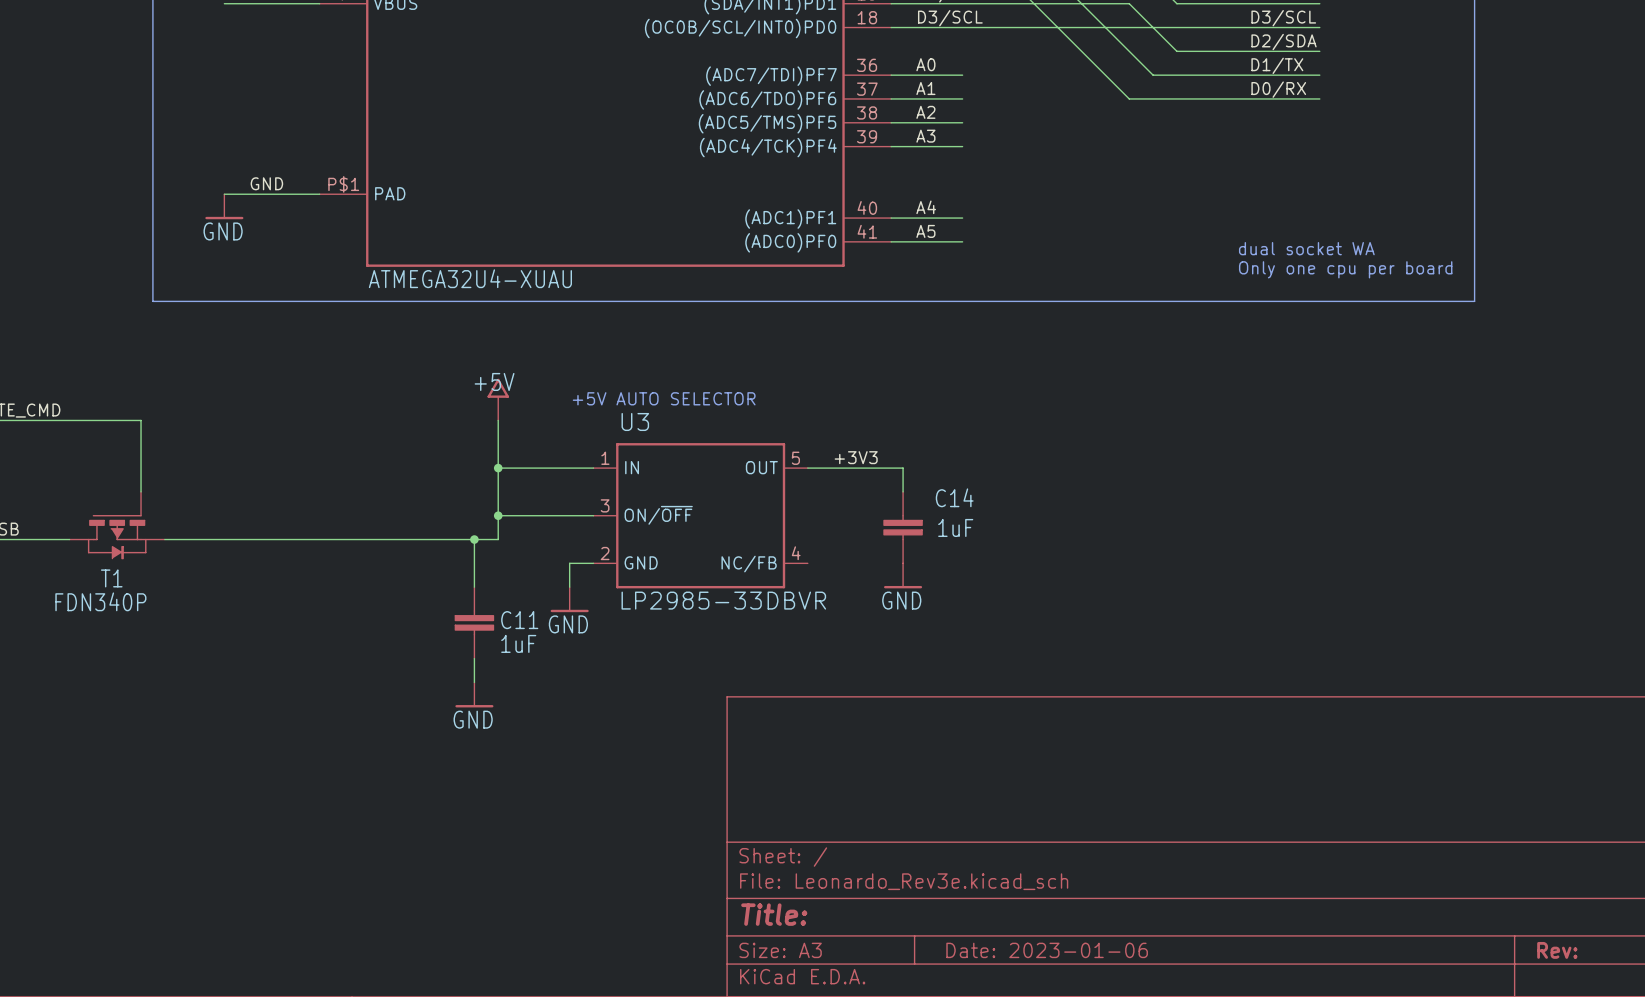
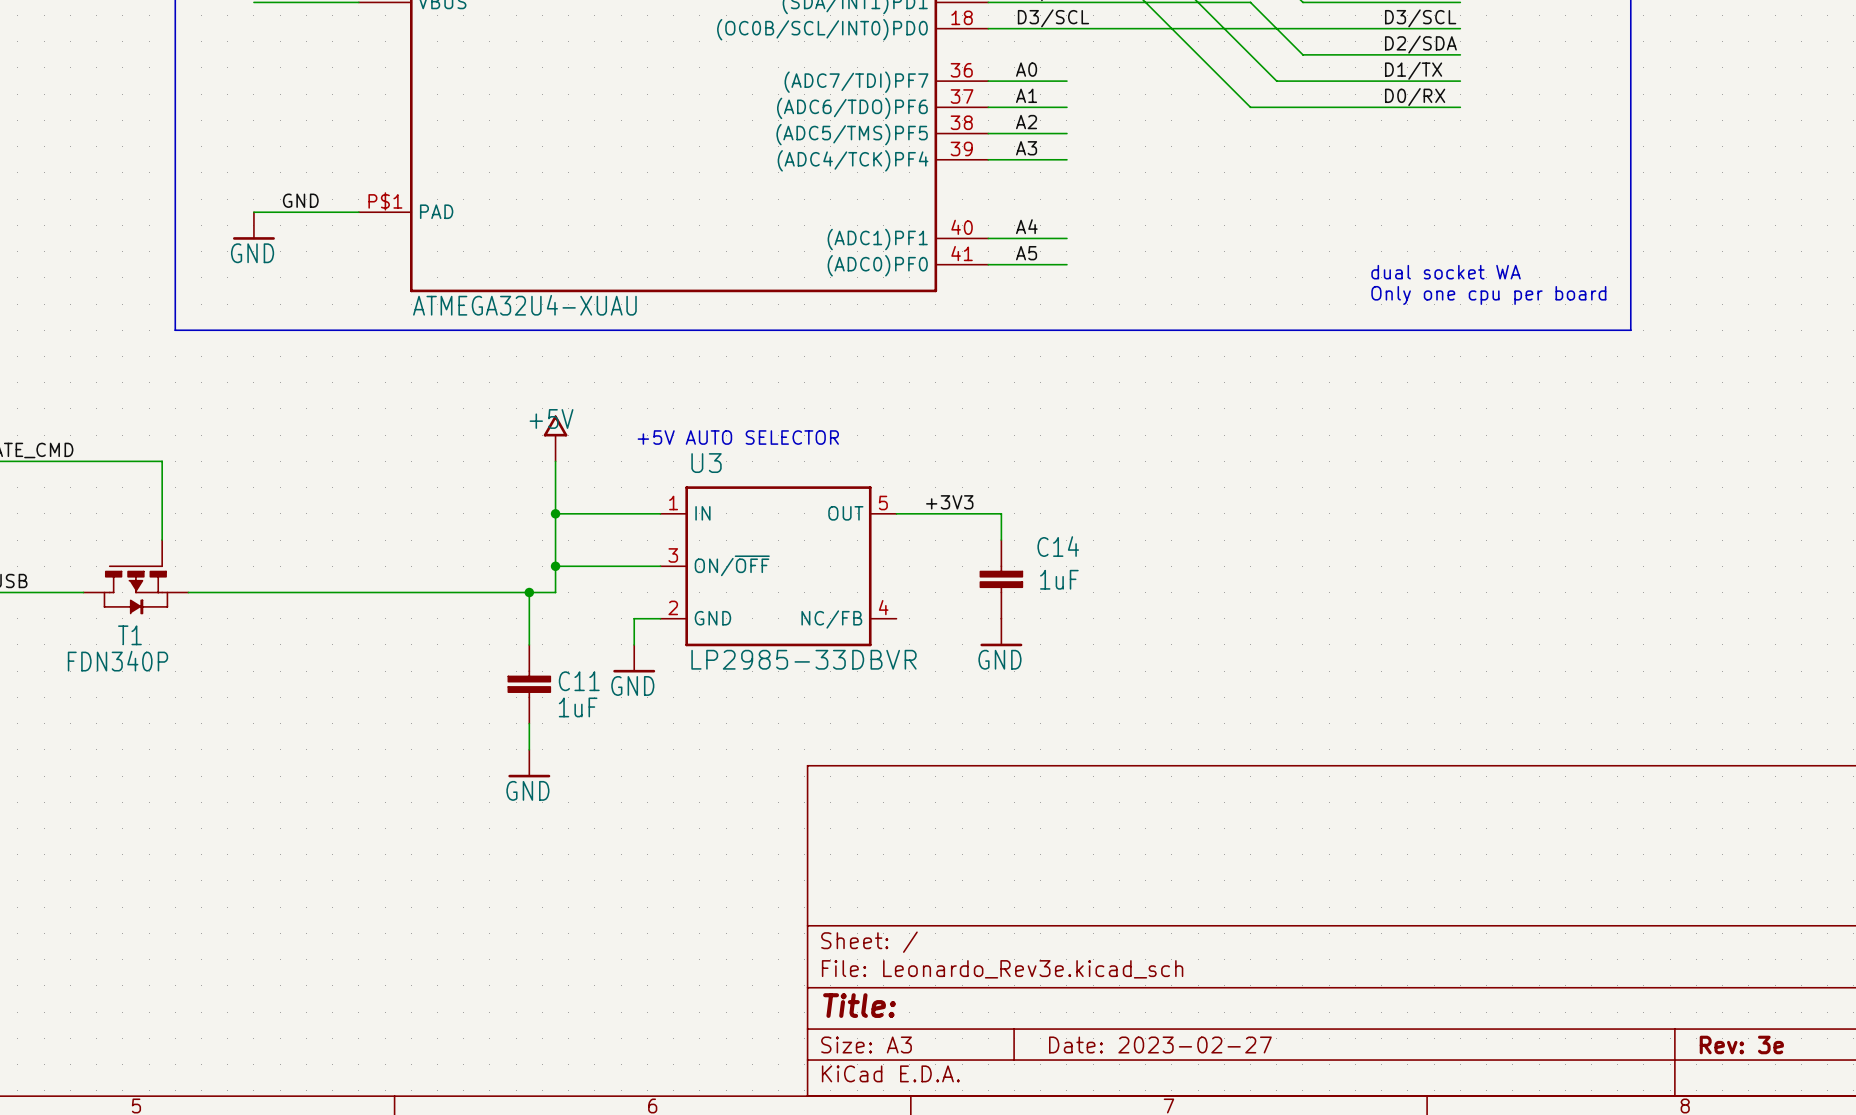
title block: Date: 2023-01-06 (1047, 950) -> Date: 2023-02-27 (1160, 1044)
title block: Rev: (1557, 950) -> Rev: 3e (1741, 1044)

